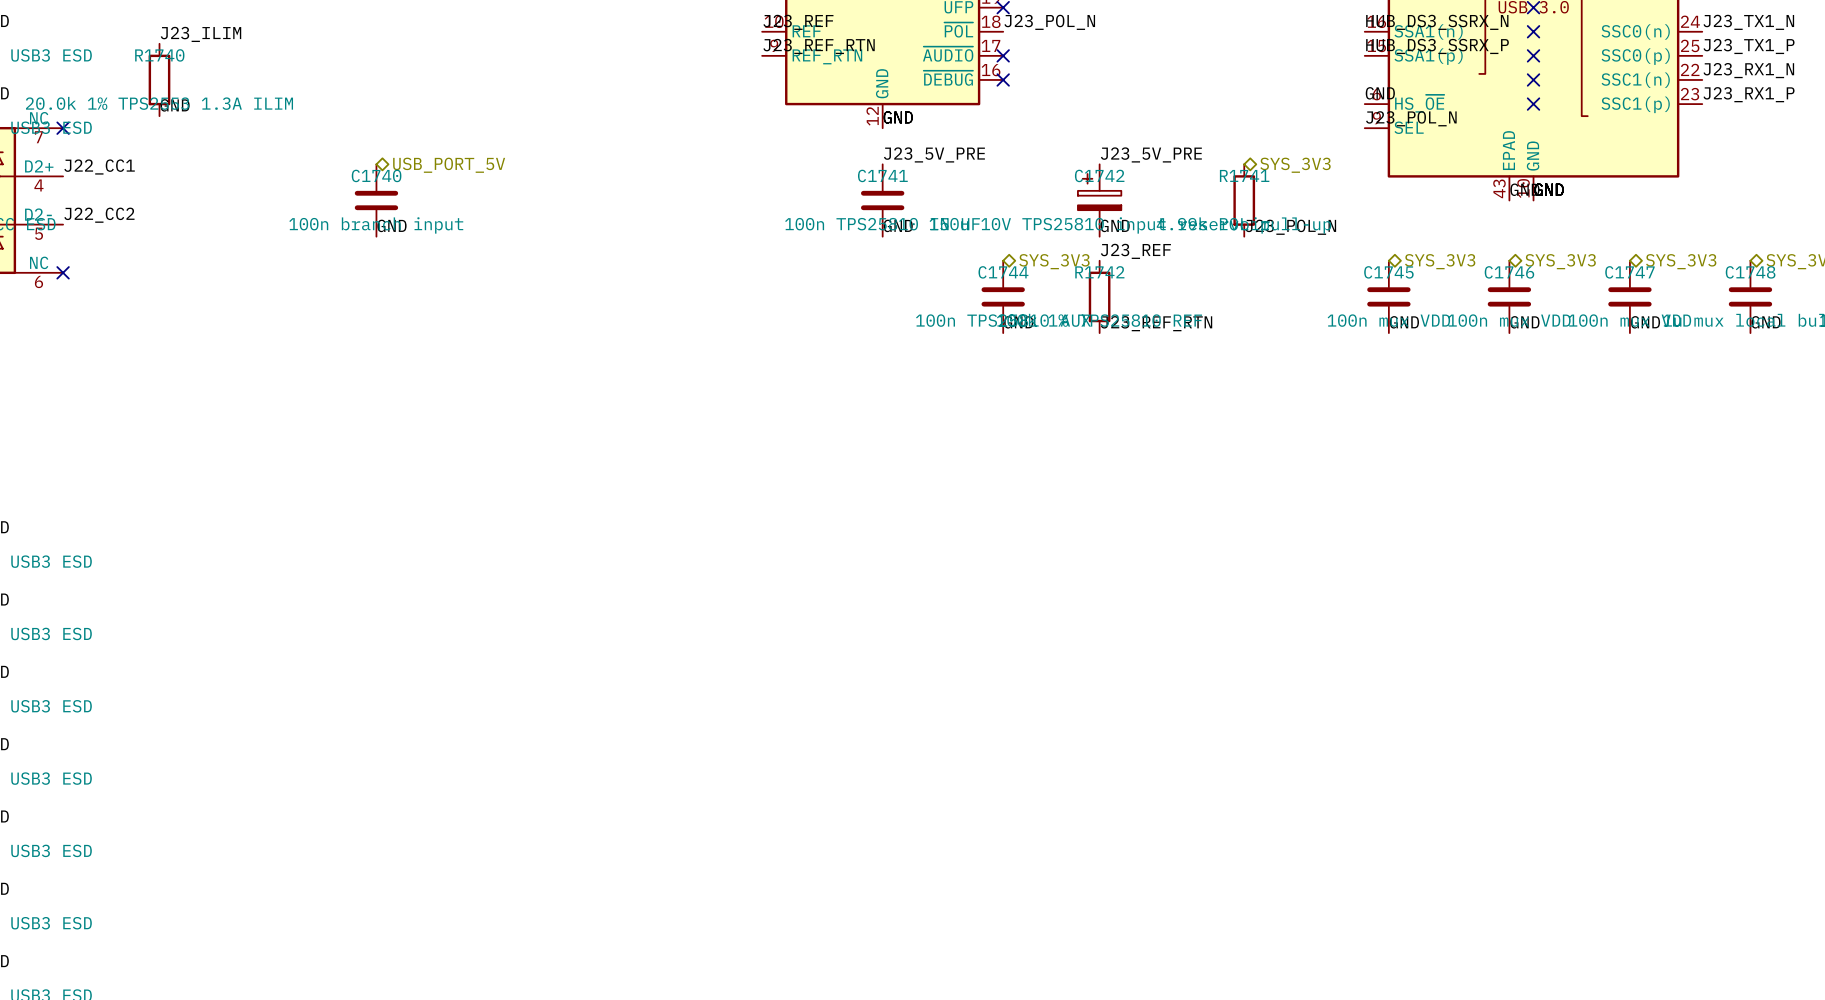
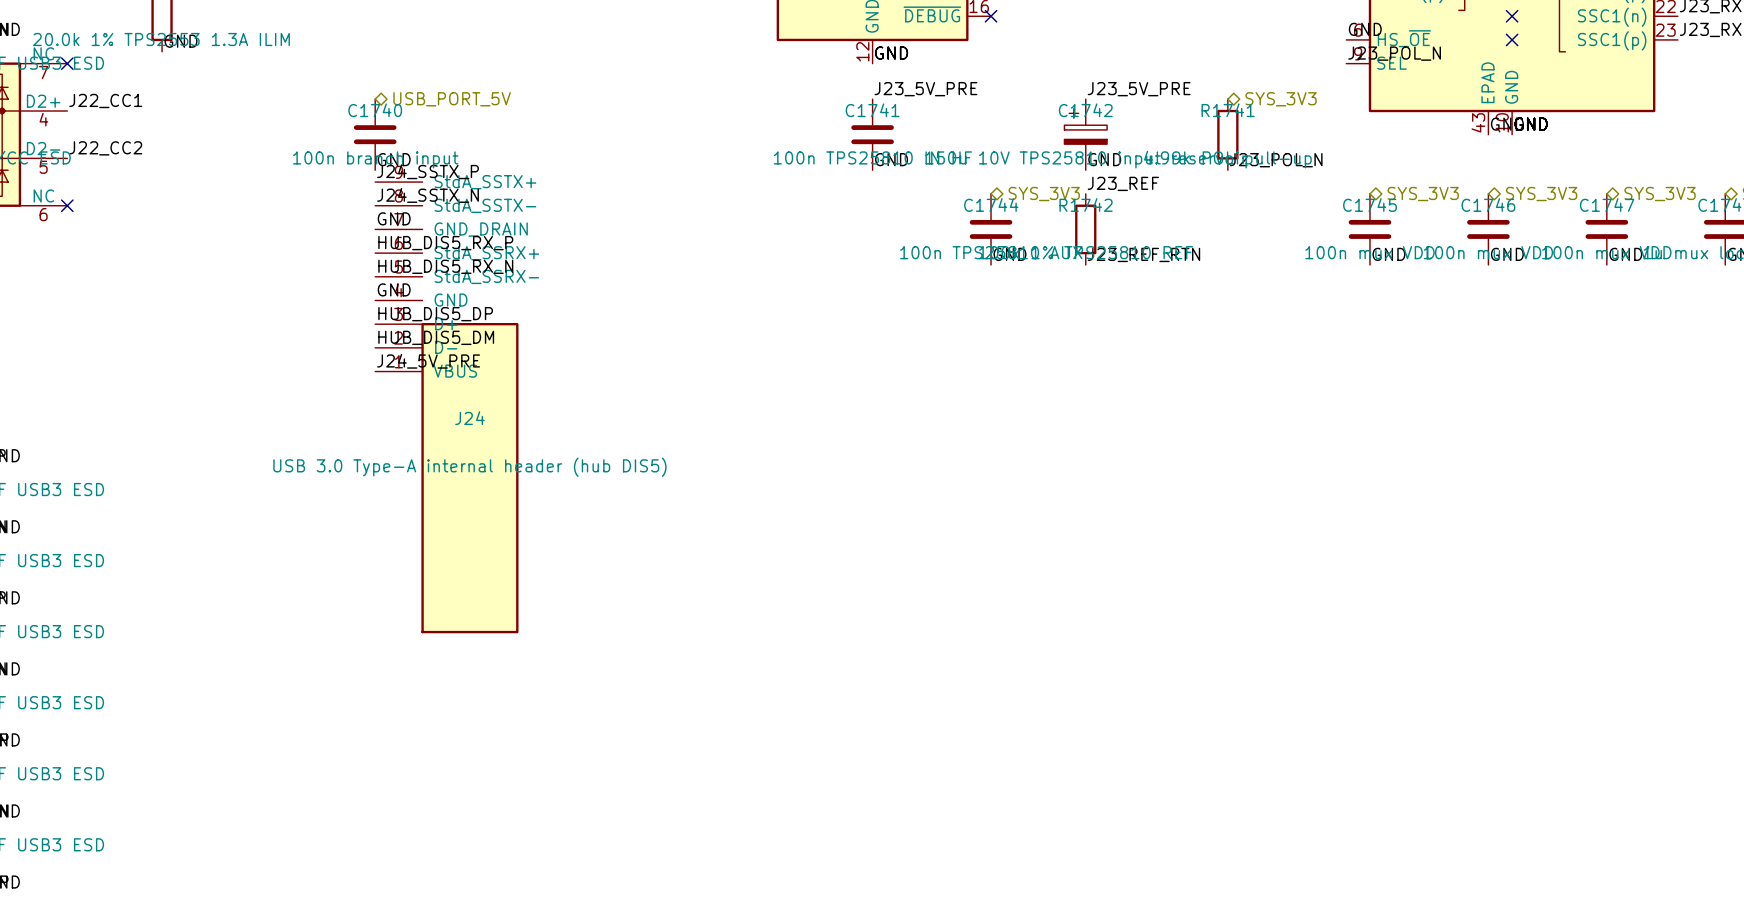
label: none -> J24_SSTX_P (428, 171)
label: none -> J24_SSTX_N (428, 195)
label: none -> GND (394, 218)
label: none -> HUB_DIS5_RX_P (445, 243)
label: none -> HUB_DIS5_RX_N (445, 266)
label: none -> GND (394, 289)
label: none -> HUB_DIS5_DP (435, 314)
label: none -> HUB_DIS5_DM (436, 337)
label: none -> J24_5V_PRE (428, 361)
J24: none -> USB 3.0 Type-A internal header (hub DIS5) (446, 407)

